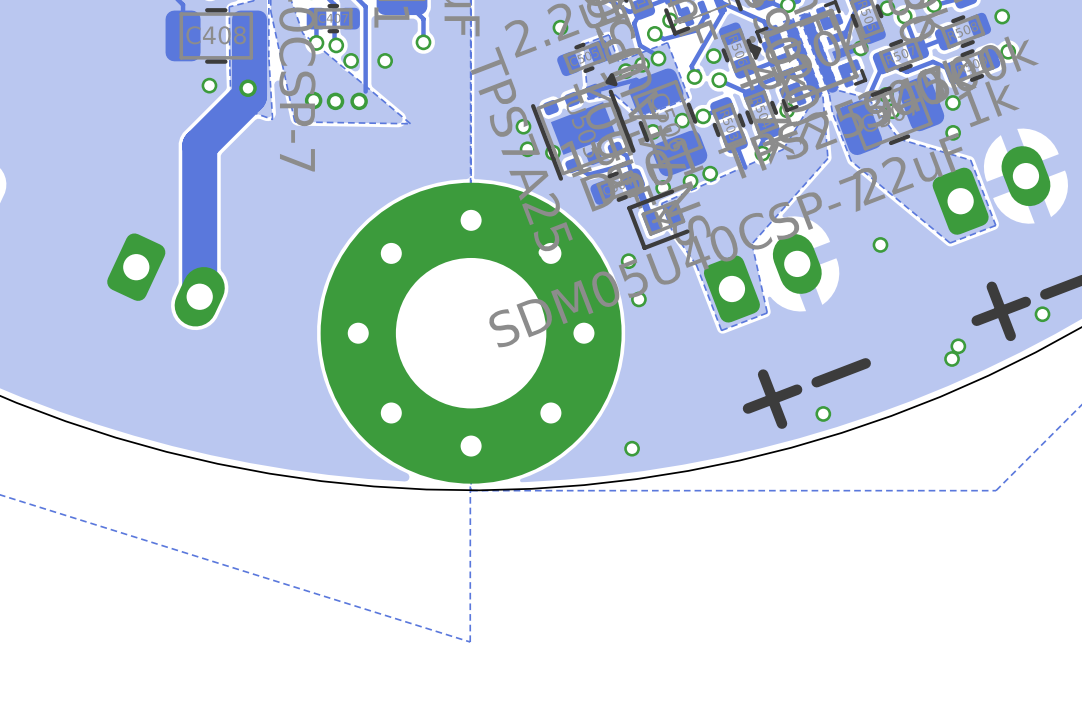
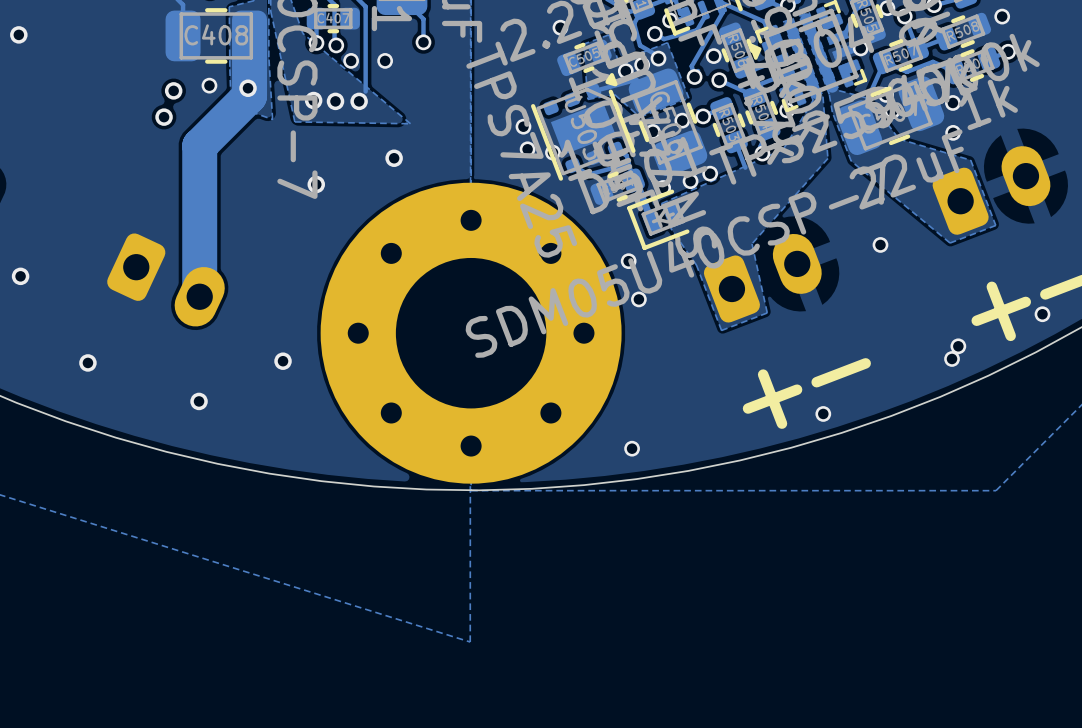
via: none -> (18, 34)
via: none -> (173, 90)
via: none -> (164, 117)
via: none -> (394, 158)
via: none -> (316, 184)
via: none -> (20, 276)
via: none -> (283, 361)
via: none -> (87, 362)
via: none -> (199, 401)

